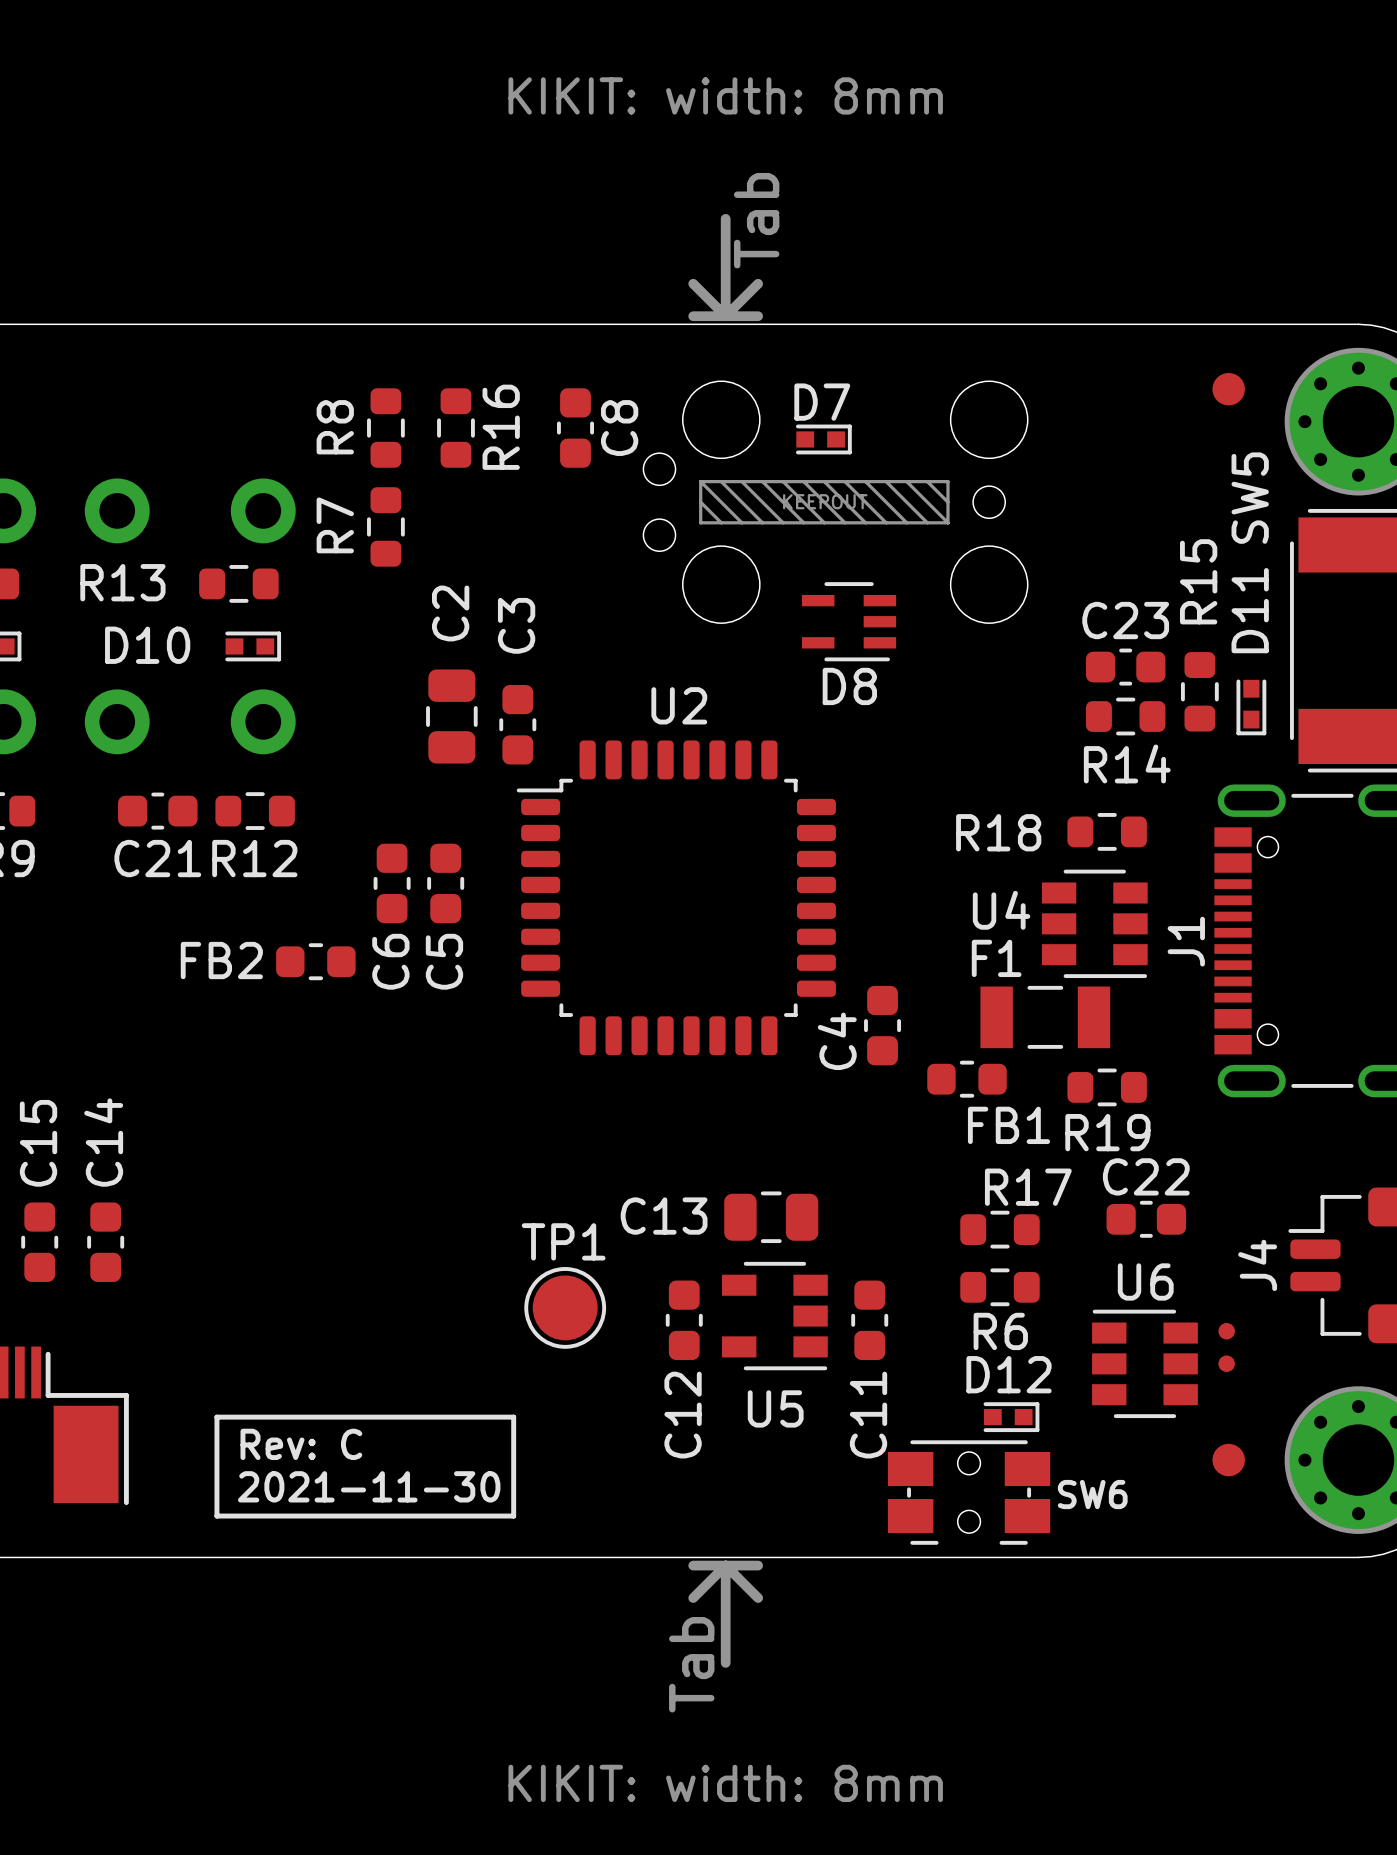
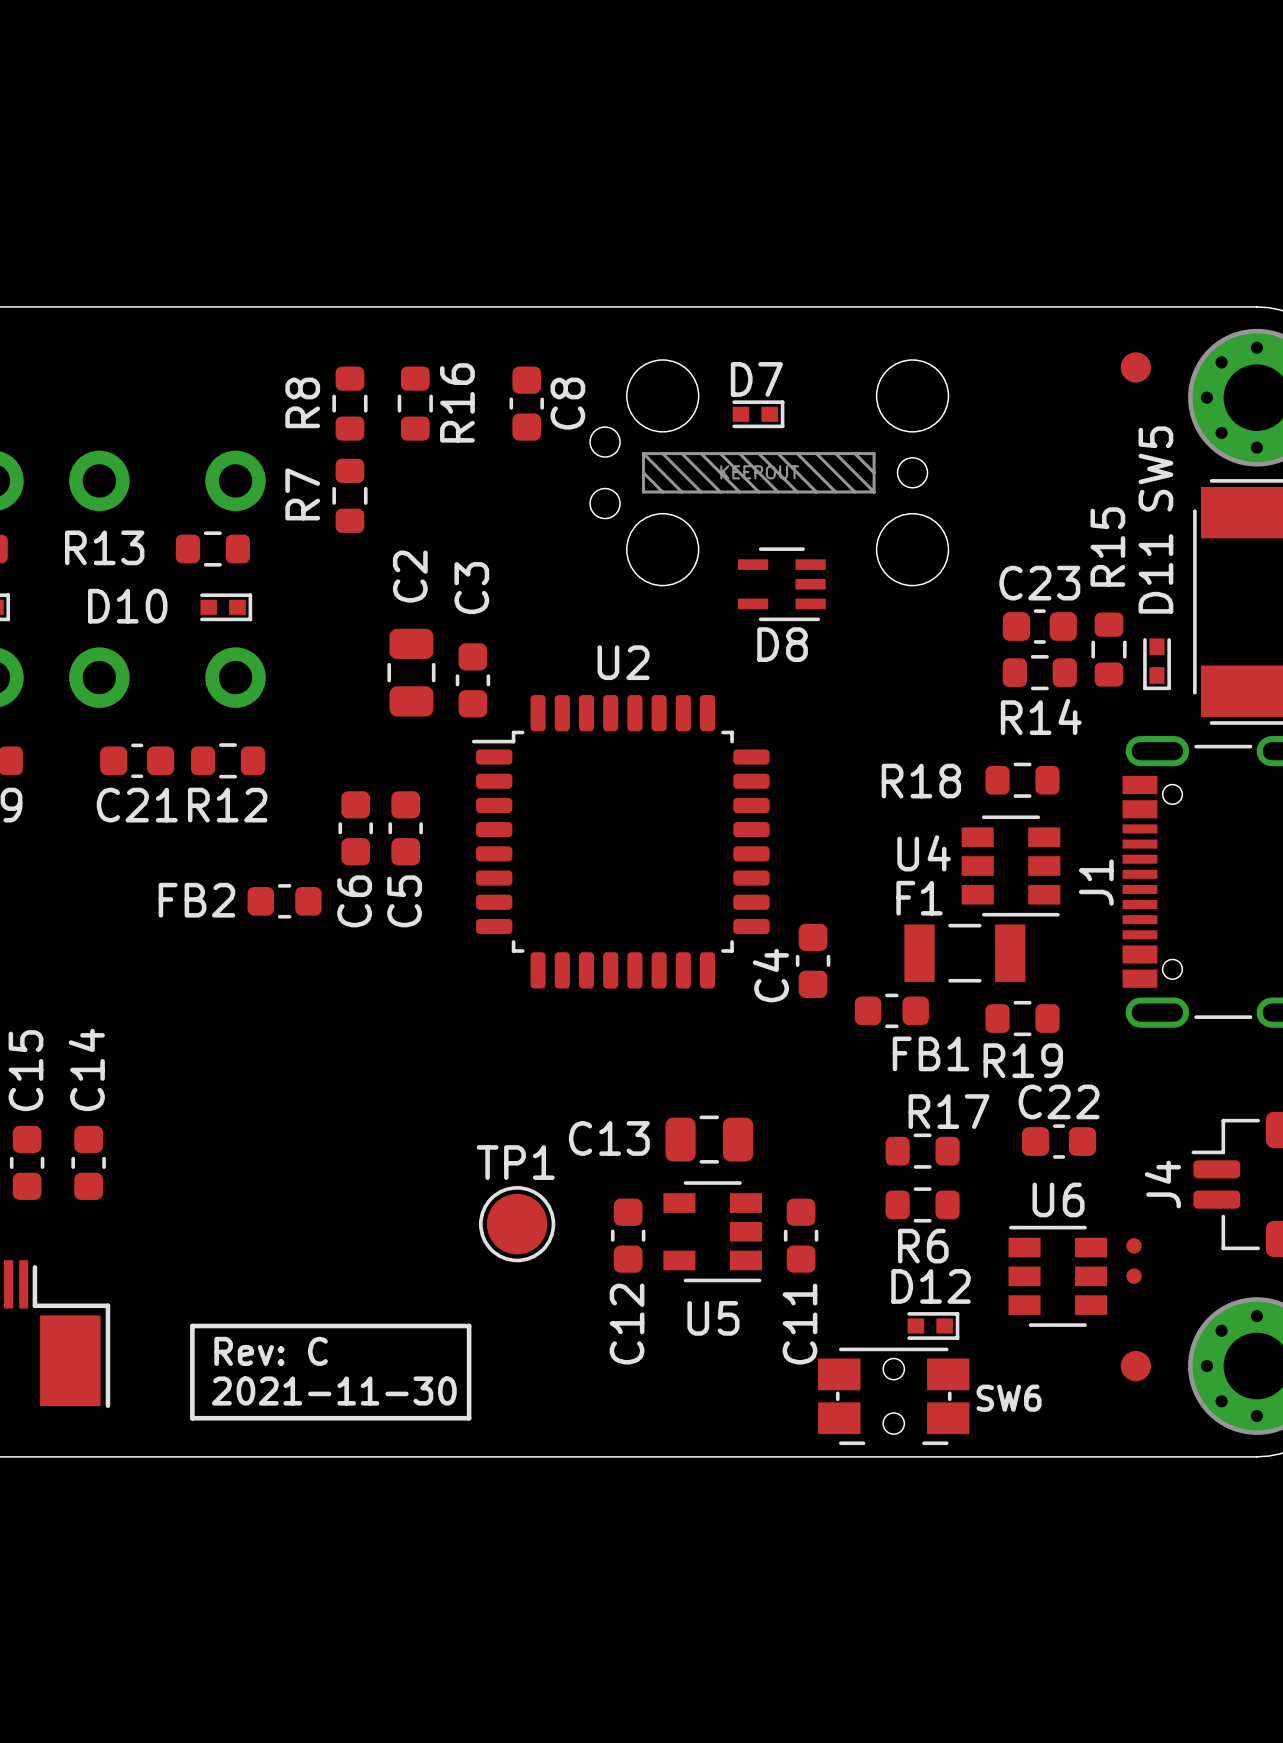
drawing: [688, 213, 764, 322] -> none
drawing: [688, 1560, 764, 1668] -> none

